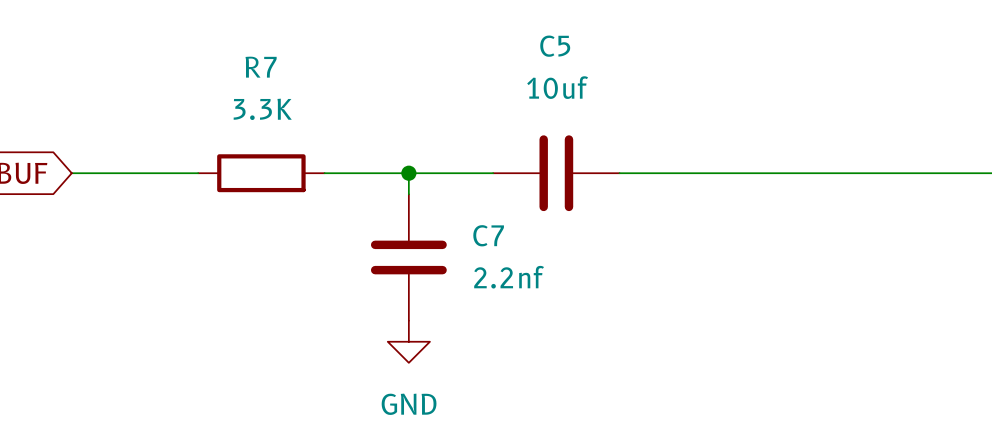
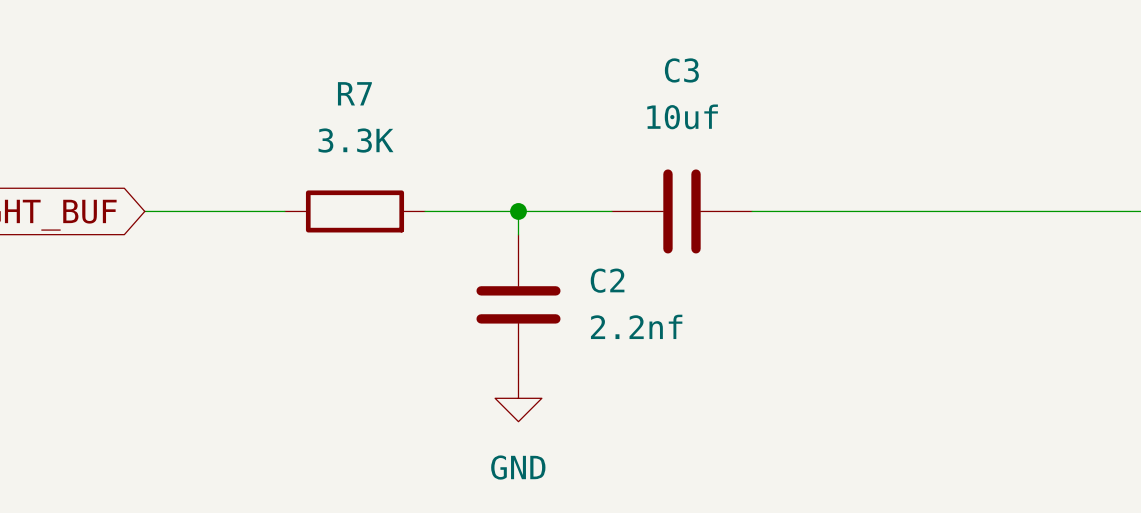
C5 name: C5 (555, 46) -> C3 (681, 70)
C7 name: C7 (488, 235) -> C2 (607, 280)

